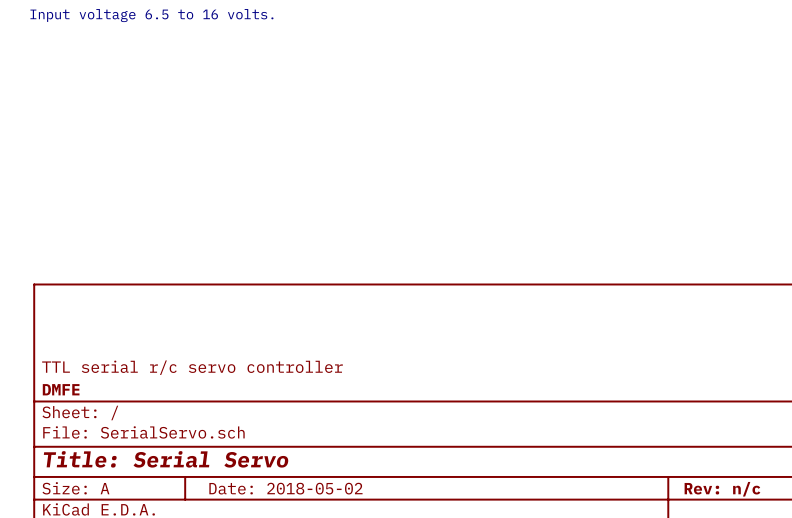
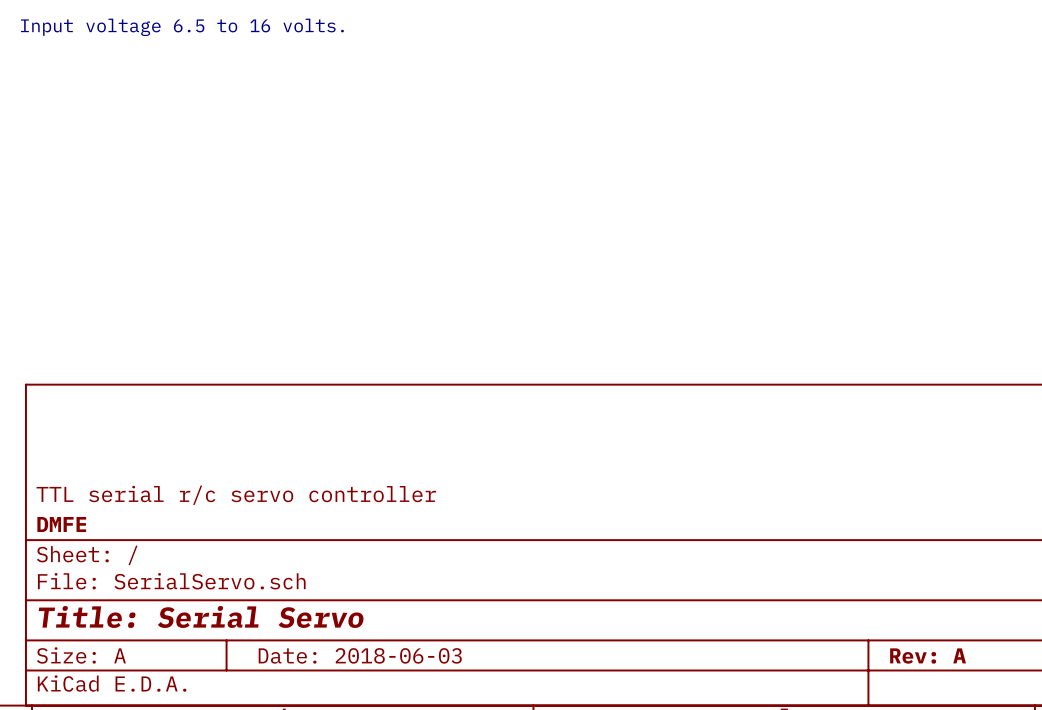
title block: Date: 2018-05-02 (285, 488) -> Date: 2018-06-03 (360, 655)
title block: Rev: n/c (722, 489) -> Rev: A (928, 656)

